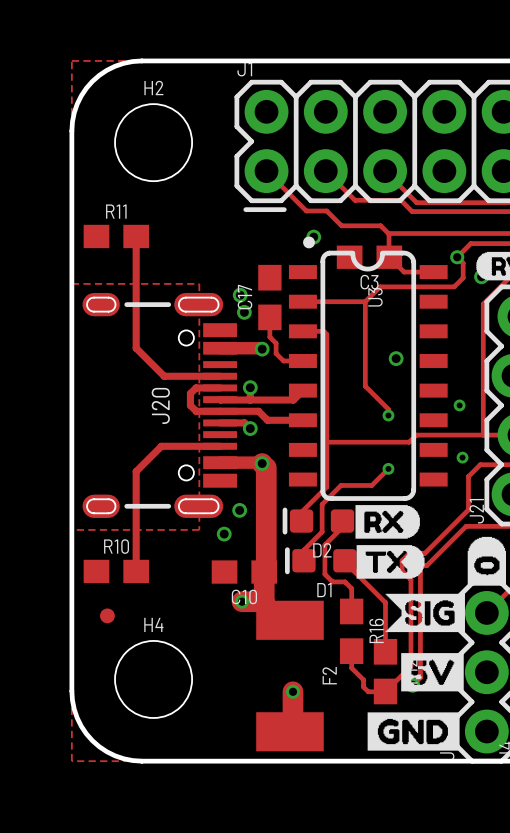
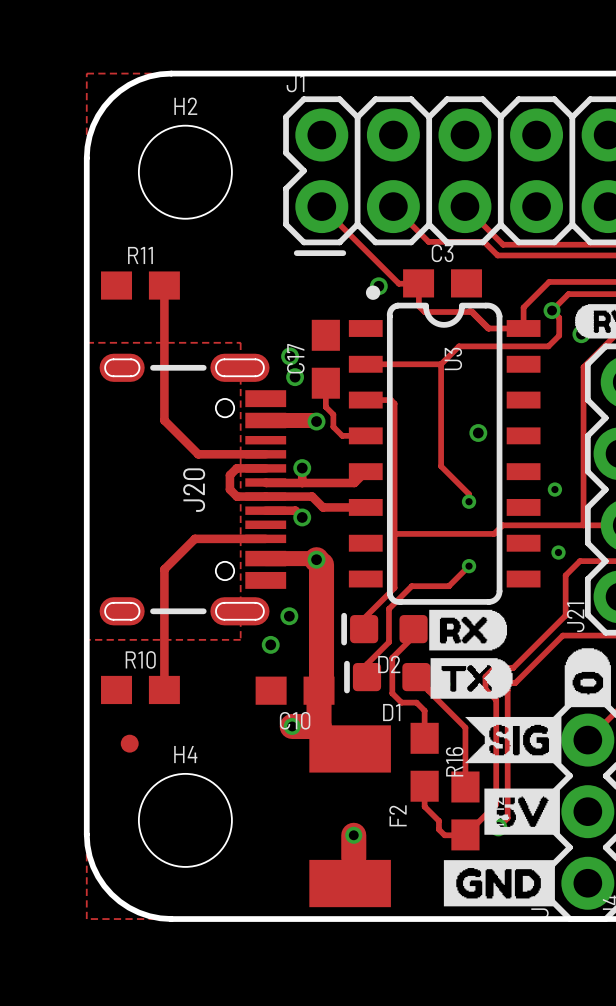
track: (306, 210) (326, 210) (341, 225) (380, 225) (389, 234) (389, 256) -> (369, 254) (398, 283) (418, 283) (418, 306) (424, 312) (472, 312) (489, 328)
track: (388, 233) (454, 233) -> (523, 328) (523, 307) (549, 281)
C3 position: (369, 257) -> (442, 283)
C3 name position: C3 (369, 282) -> C3 (442, 253)

